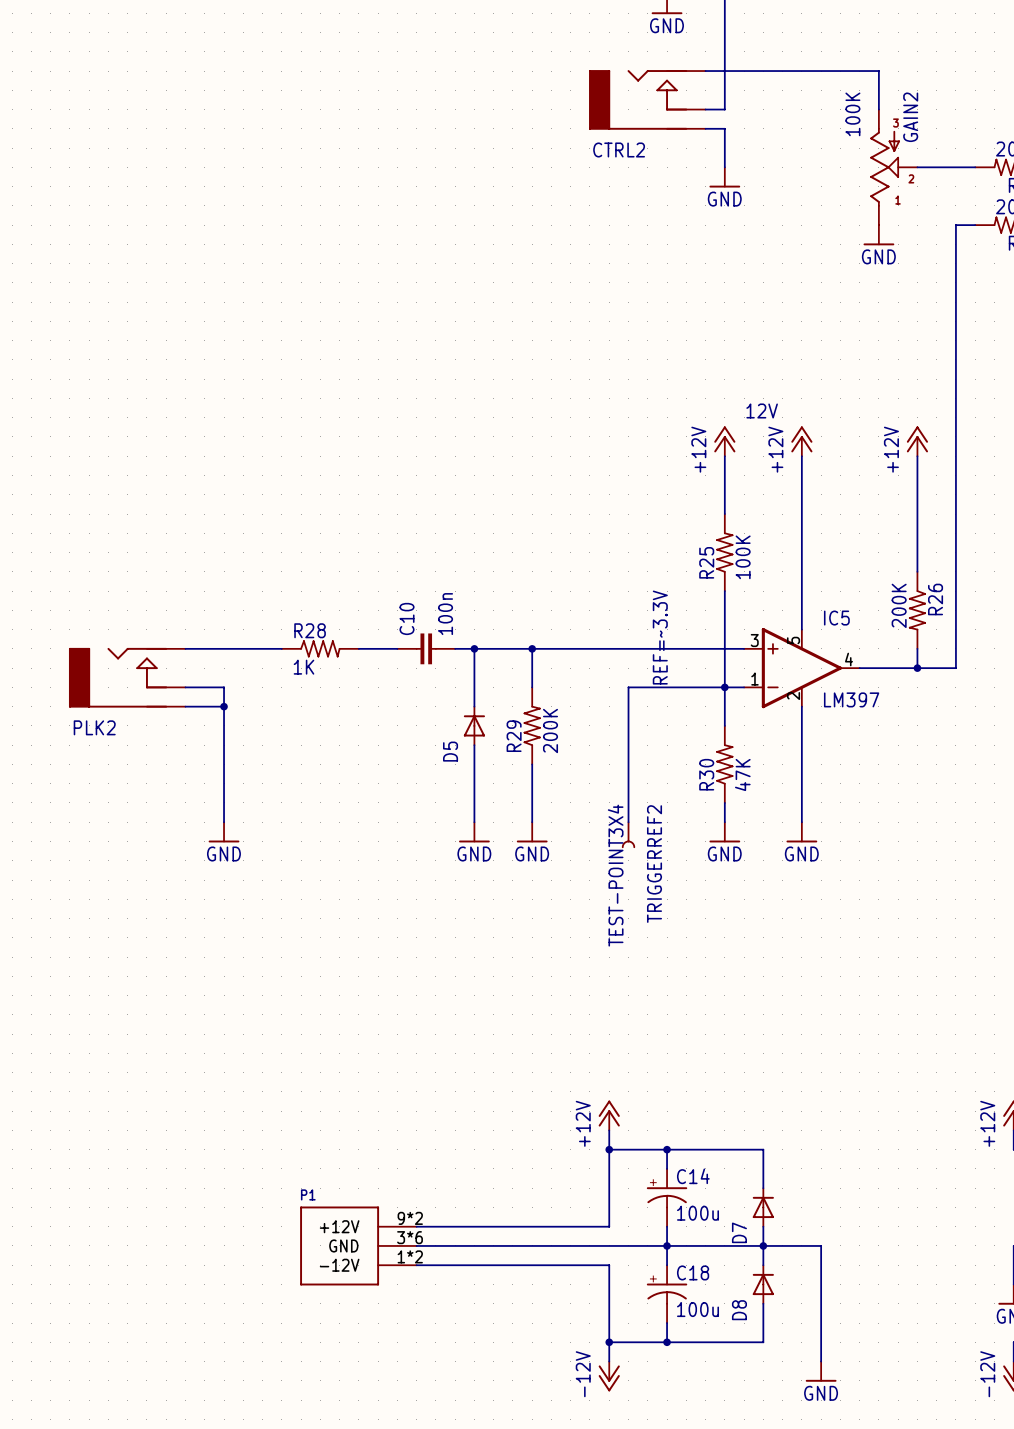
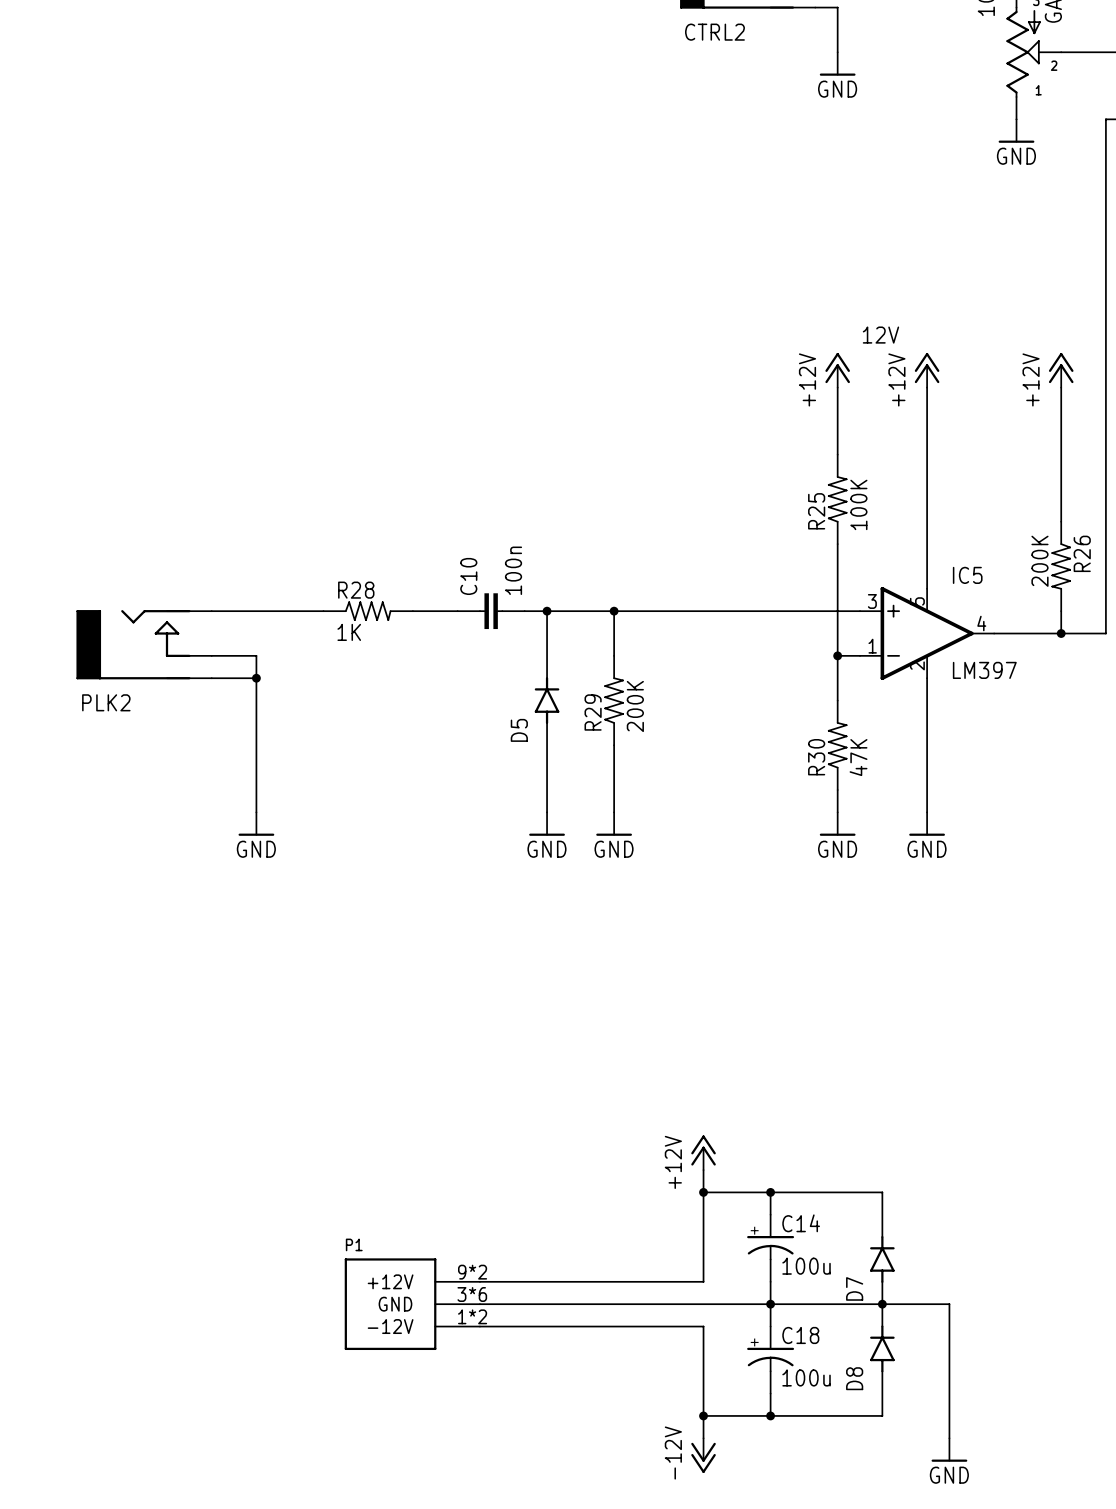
text: REF=~3.3V (660, 637) -> none
wire: (724, 687) (628, 687) (628, 822) -> none
D5 symbol: [463, 706, 486, 746] -> [534, 677, 560, 725]
TRIGGERREF2: TEST-POINT3X4 (628, 834) -> none
D7 symbol: [752, 1188, 774, 1227] -> [870, 1236, 895, 1283]
D8 symbol: [752, 1265, 774, 1304] -> [870, 1325, 895, 1373]

